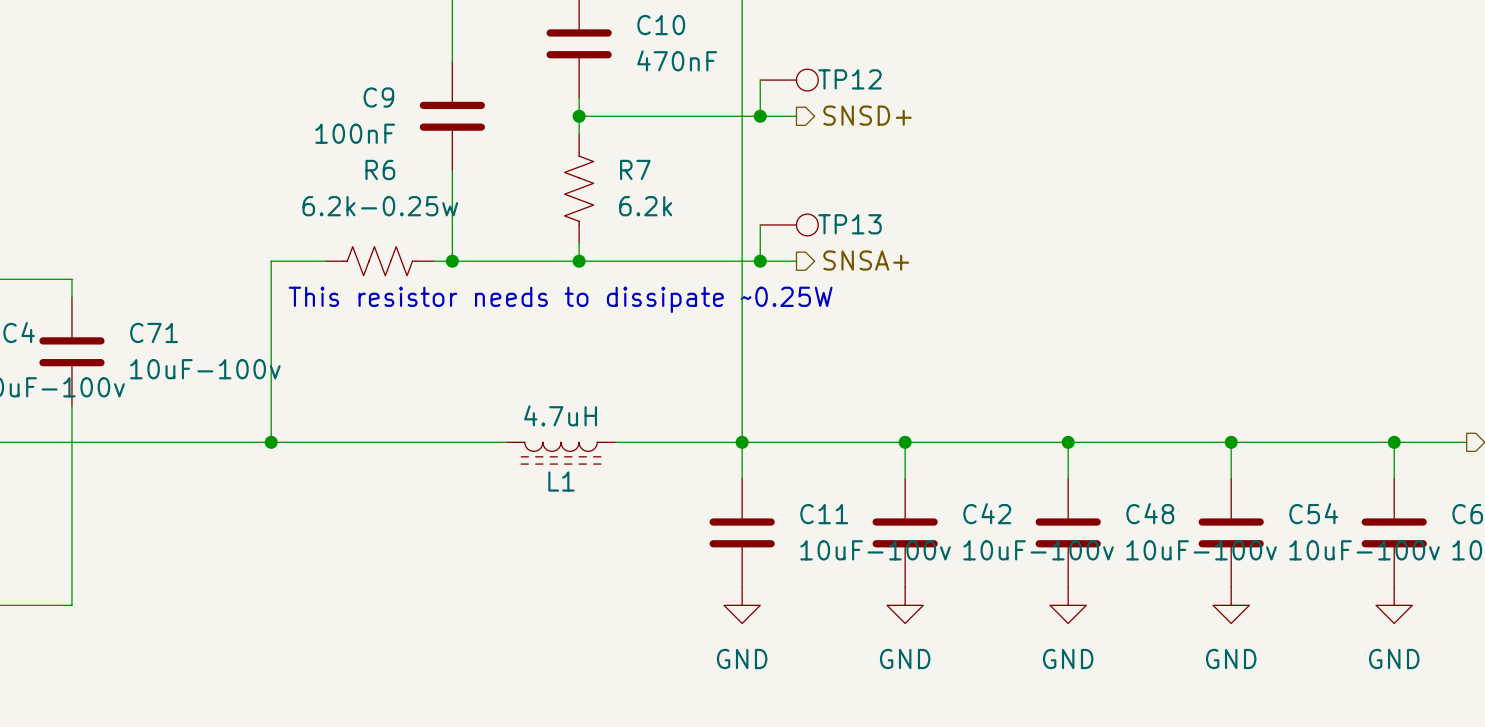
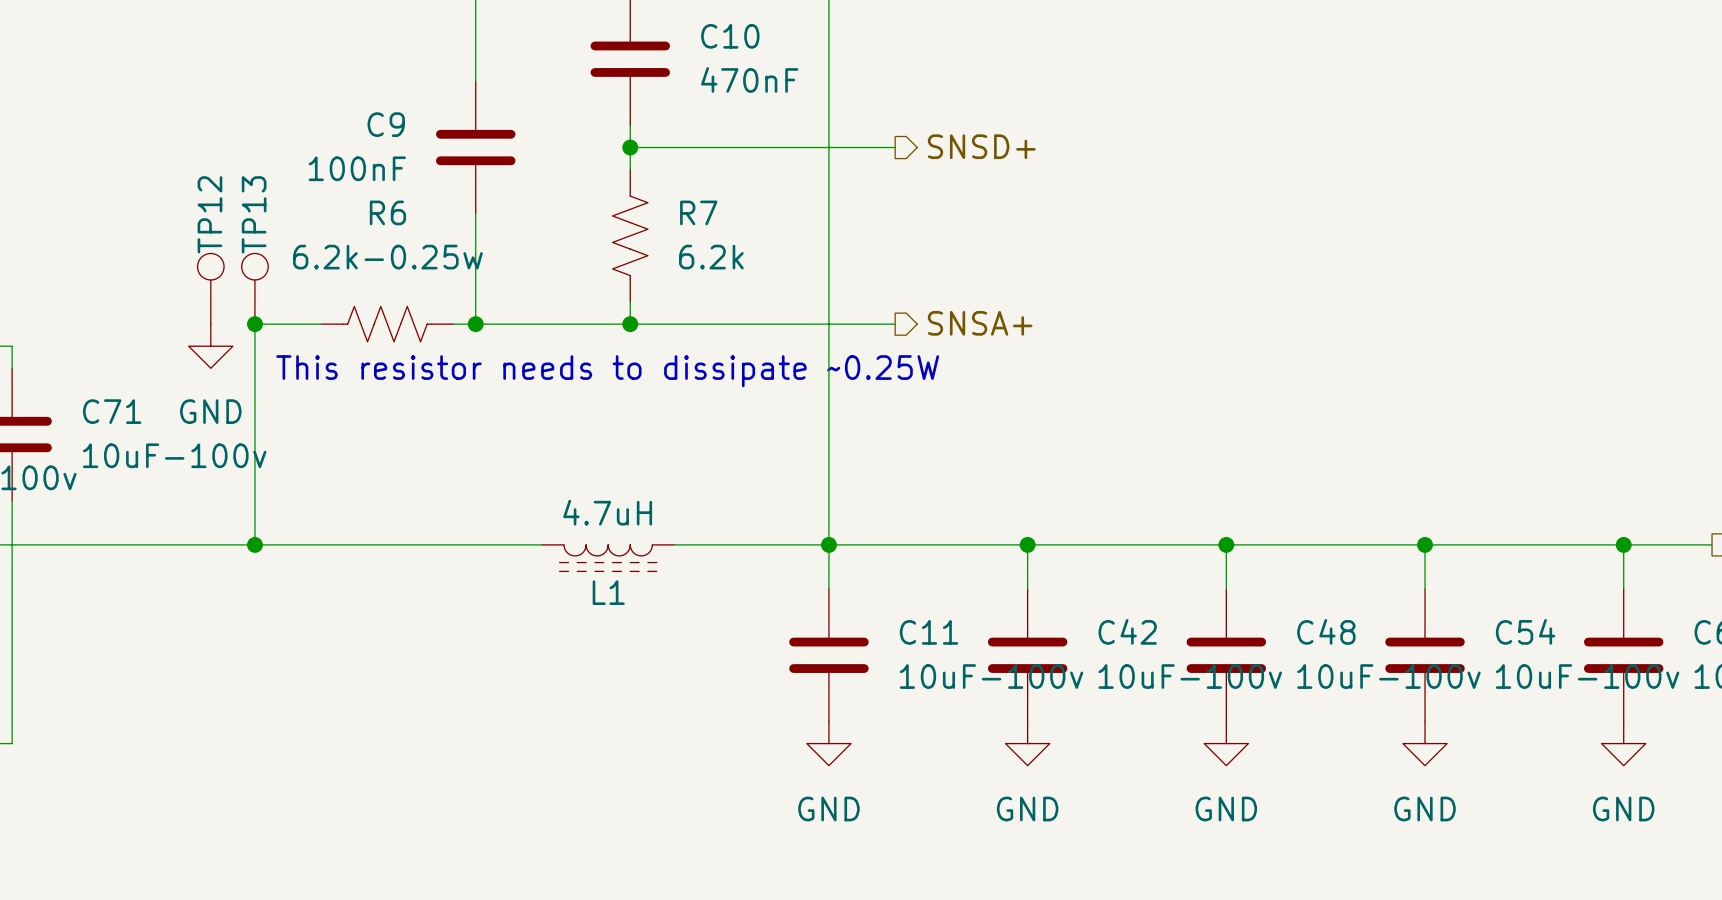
wire: (760, 80) (760, 116) -> none
TP12 position: (789, 80) -> (210, 288)
TP12 rotation: 0° (807, 80) -> 90° counterclockwise (210, 266)
junction: (760, 116) -> none
wire: (760, 224) (760, 261) -> none
TP13 position: (789, 224) -> (254, 288)
TP13 rotation: 0° (807, 224) -> 90° counterclockwise (254, 266)
junction: none -> (254, 324)
junction: (760, 261) -> none
power symbol: none -> GND (210, 346)

